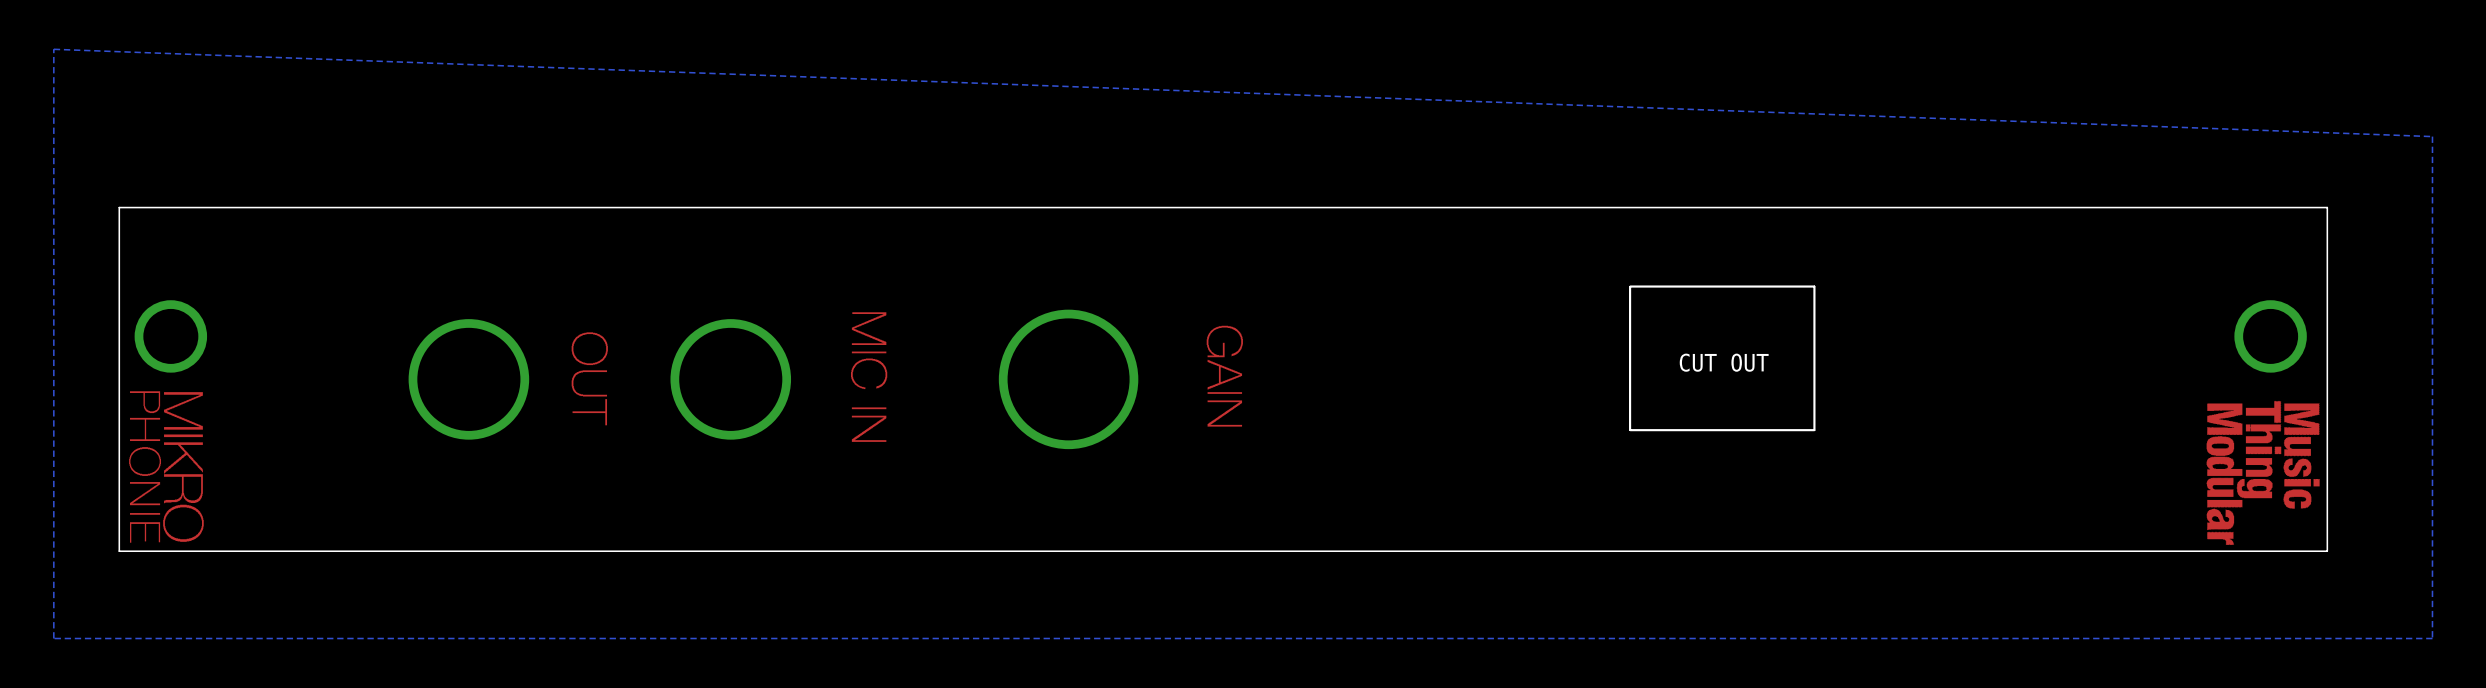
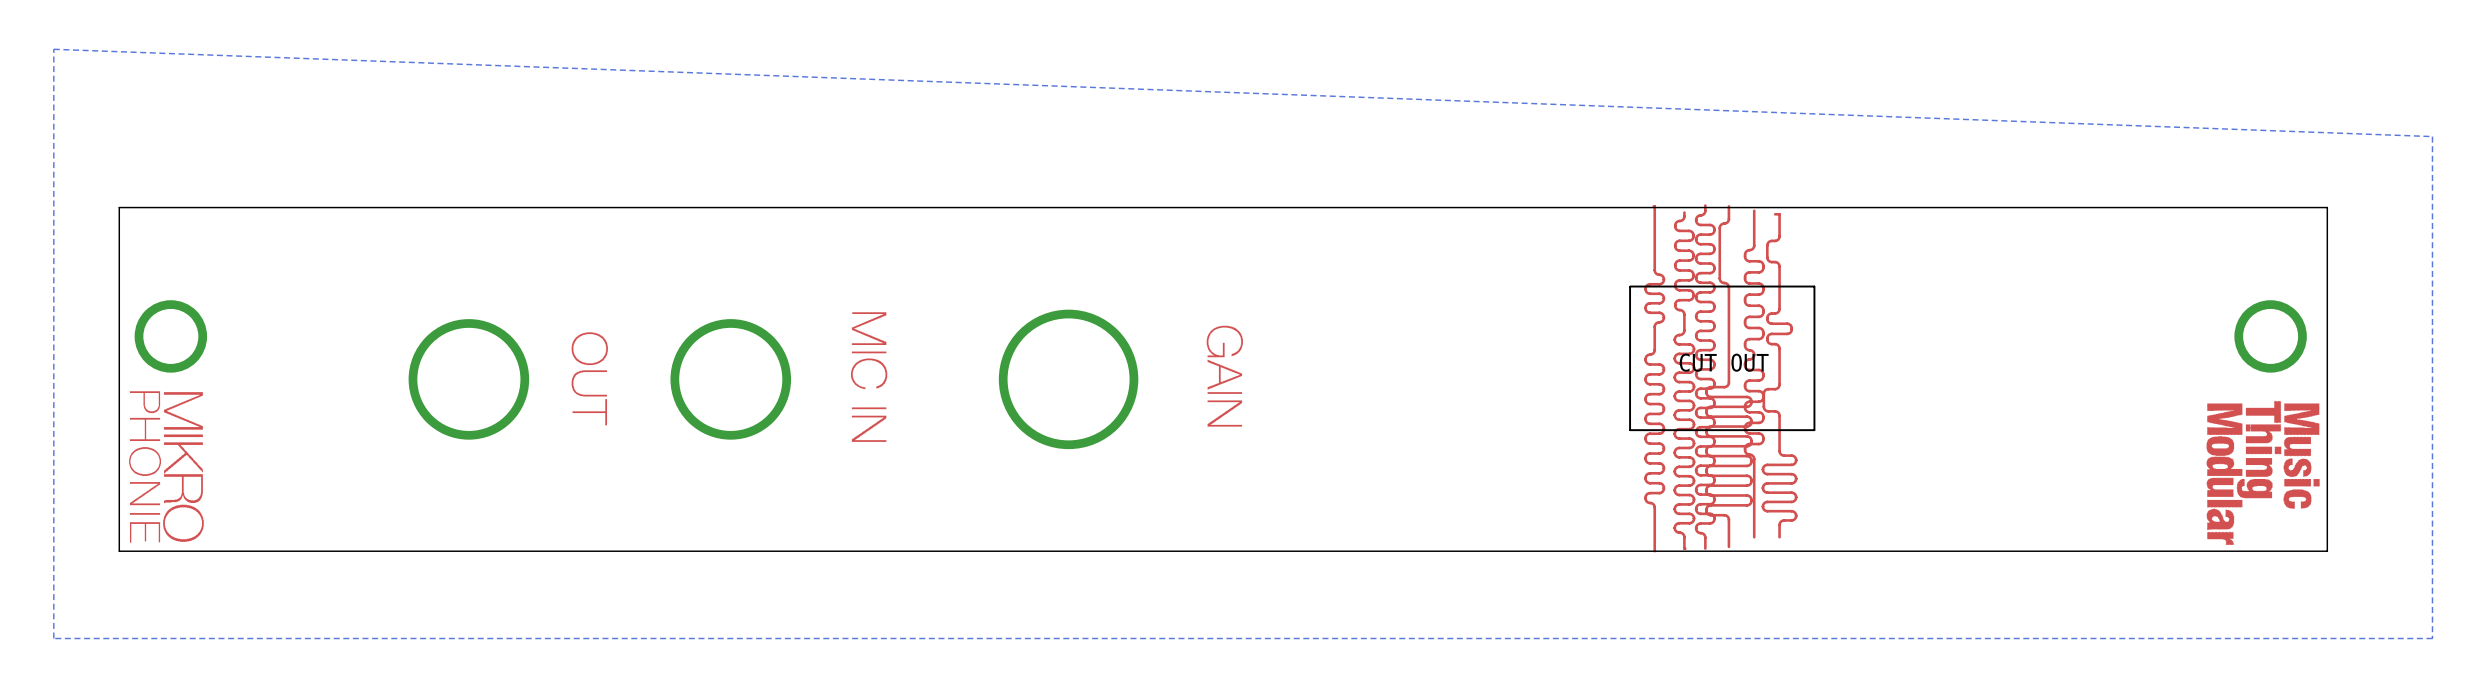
top track: none -> (1705, 205) (1704, 213) (1697, 216) (1696, 219) (1698, 224) (1711, 225) (1714, 229) (1712, 233) (1699, 234) (1696, 239) (1698, 243) (1711, 244) (1714, 248) (1712, 253) (1699, 254) (1696, 258) (1698, 262) (1711, 263) (1714, 268) (1712, 272) (1699, 273) (1696, 277) (1698, 282) (1711, 282) (1714, 287) (1712, 291) (1699, 292) (1696, 296) (1698, 301) (1711, 302) (1714, 306) (1712, 311) (1699, 311) (1696, 316) (1698, 320) (1711, 321) (1714, 325) (1712, 330) (1699, 331) (1696, 335) (1698, 339) (1711, 340) (1714, 345) (1712, 349) (1699, 350) (1696, 354) (1698, 359) (1711, 359) (1714, 364) (1712, 368) (1699, 369) (1696, 374) (1698, 378) (1711, 379) (1714, 383) (1712, 388) (1699, 388) (1696, 393) (1698, 397) (1711, 398) (1714, 402) (1712, 407) (1699, 408) (1696, 412) (1698, 416) (1711, 417) (1714, 421) (1712, 426) (1699, 427) (1696, 431) (1698, 436) (1711, 436) (1714, 440) (1712, 445) (1699, 446) (1696, 450) (1698, 455) (1711, 456) (1714, 460) (1712, 465) (1699, 465) (1696, 469) (1698, 474) (1711, 475) (1714, 479) (1712, 484) (1699, 485) (1696, 488) (1698, 493) (1711, 494) (1714, 498) (1712, 503) (1699, 504) (1696, 508) (1698, 513) (1711, 514) (1714, 517) (1712, 522) (1699, 523) (1696, 526) (1697, 531) (1705, 535) (1705, 548)
top track: none -> (1653, 206) (1654, 270) (1663, 279)
top track: none -> (1728, 206) (1728, 220) (1721, 224) (1719, 228) (1719, 279) (1728, 287) (1728, 383) (1725, 386) (1709, 387) (1706, 391) (1709, 396) (1747, 397) (1751, 400) (1748, 406) (1710, 406) (1706, 410) (1709, 416) (1747, 416) (1751, 420) (1748, 426) (1710, 426) (1706, 430) (1709, 436) (1747, 436) (1751, 440) (1748, 446) (1710, 446) (1706, 449) (1709, 455) (1747, 456) (1751, 459) (1748, 465) (1710, 465) (1706, 469) (1709, 475) (1747, 475) (1751, 479) (1748, 485) (1710, 485) (1706, 489) (1709, 495) (1747, 495) (1751, 498) (1751, 502) (1748, 505) (1710, 505) (1706, 508) (1709, 514) (1724, 515) (1728, 517) (1728, 546)
top track: none -> (1754, 210) (1754, 246) (1746, 251) (1745, 254) (1747, 260) (1760, 261) (1763, 265) (1761, 271) (1748, 272) (1745, 276) (1747, 282) (1760, 283) (1763, 288) (1761, 294) (1748, 294) (1745, 299) (1747, 305) (1760, 305) (1763, 310) (1761, 316) (1748, 317) (1745, 321) (1747, 327) (1760, 328) (1763, 332) (1761, 338) (1748, 339) (1745, 343) (1746, 348) (1752, 351) (1754, 354) (1752, 358) (1745, 361) (1745, 367) (1749, 369) (1760, 370) (1763, 374) (1761, 379) (1748, 380) (1745, 385) (1747, 390) (1760, 391) (1763, 395) (1761, 401) (1748, 401) (1745, 406) (1747, 411) (1760, 412) (1763, 416) (1761, 422) (1748, 423) (1745, 426) (1747, 432) (1760, 433) (1763, 437) (1761, 443) (1748, 444) (1745, 448) (1746, 452) (1754, 458) (1754, 537)
top track: none -> (1684, 212) (1683, 218) (1676, 222) (1675, 228) (1678, 230) (1691, 231) (1693, 237) (1690, 240) (1677, 241) (1675, 247) (1678, 250) (1691, 251) (1693, 256) (1690, 260) (1677, 261) (1675, 266) (1678, 270) (1691, 271) (1693, 276) (1690, 280) (1677, 281) (1675, 286) (1678, 290) (1691, 290) (1693, 296) (1690, 299) (1678, 300) (1675, 303) (1676, 308) (1684, 313) (1684, 330) (1674, 339)
top track: none -> (1775, 214) (1779, 214) (1779, 236) (1777, 240) (1767, 243) (1767, 257) (1769, 261) (1776, 262) (1779, 265) (1779, 309) (1776, 313) (1769, 314) (1767, 319) (1770, 323) (1788, 324) (1791, 329) (1788, 333) (1771, 333) (1767, 336) (1768, 342) (1776, 344) (1779, 347) (1779, 384) (1776, 388) (1764, 390) (1763, 407) (1766, 410) (1776, 411) (1779, 414) (1780, 453) (1782, 455) (1793, 455) (1796, 460)
top track: none -> (1663, 279) (1661, 283) (1648, 284) (1645, 288)
top track: none -> (1645, 289) (1647, 293) (1660, 293) (1663, 298)
top track: none -> (1663, 298) (1661, 302) (1648, 303) (1645, 307)
top track: none -> (1645, 308) (1647, 312) (1660, 312) (1663, 317)
top track: none -> (1663, 317) (1662, 320) (1654, 325) (1654, 351) (1647, 355) (1645, 359) (1647, 363) (1660, 364) (1663, 369) (1661, 373) (1648, 374) (1645, 378) (1647, 383) (1660, 384) (1663, 388) (1661, 393) (1648, 394) (1645, 398) (1647, 403) (1660, 404) (1663, 408) (1661, 413) (1648, 414) (1645, 418) (1647, 423) (1660, 424) (1663, 427) (1661, 433) (1648, 433) (1645, 437) (1647, 443) (1660, 443) (1663, 447) (1661, 452) (1648, 453) (1645, 457) (1647, 462) (1660, 463) (1663, 467) (1661, 472) (1648, 473) (1645, 477) (1647, 482) (1660, 483) (1663, 487) (1661, 492) (1648, 493) (1645, 497) (1646, 501) (1652, 503) (1654, 506) (1654, 551)
top track: none -> (1674, 339) (1677, 344) (1690, 344) (1694, 349)
top track: none -> (1694, 349) (1691, 353) (1678, 354) (1674, 358)
top track: none -> (1674, 358) (1677, 362) (1690, 363) (1694, 367)
top track: none -> (1694, 368) (1691, 372) (1678, 372) (1674, 377)
top track: none -> (1674, 377) (1677, 381) (1690, 382) (1694, 386)
top track: none -> (1694, 386) (1691, 391) (1678, 391) (1674, 396)
top track: none -> (1674, 396) (1677, 400) (1690, 401) (1694, 405)
top track: none -> (1694, 405) (1691, 409) (1678, 410) (1674, 414)
top track: none -> (1674, 415) (1677, 419) (1690, 419) (1694, 424)
top track: none -> (1694, 424) (1691, 428) (1678, 429) (1674, 433)
top track: none -> (1674, 433) (1677, 438) (1690, 438) (1694, 443)
top track: none -> (1694, 443) (1691, 447) (1678, 448) (1674, 452)
top track: none -> (1674, 452) (1677, 457) (1690, 457) (1694, 461)
top track: none -> (1796, 460) (1792, 464) (1766, 464) (1762, 469)
top track: none -> (1694, 462) (1691, 466) (1678, 466) (1674, 471)
top track: none -> (1762, 469) (1766, 473) (1792, 474) (1796, 478)
top track: none -> (1674, 471) (1677, 475) (1690, 476) (1694, 480)
top track: none -> (1796, 478) (1792, 483) (1766, 483) (1762, 487)
top track: none -> (1694, 481) (1690, 485) (1677, 485) (1674, 490)
top track: none -> (1762, 488) (1766, 492) (1792, 492) (1795, 496) (1792, 501) (1766, 501) (1763, 504) (1763, 508) (1766, 511) (1792, 511) (1795, 513) (1793, 519) (1780, 522) (1779, 537)
top track: none -> (1674, 490) (1677, 494) (1690, 495) (1694, 499)
top track: none -> (1694, 499) (1691, 504) (1678, 504) (1674, 509)
top track: none -> (1674, 509) (1677, 513) (1690, 514) (1694, 518)
top track: none -> (1694, 518) (1691, 522) (1678, 523) (1674, 527)
top track: none -> (1674, 528) (1676, 531) (1683, 534) (1685, 548)

